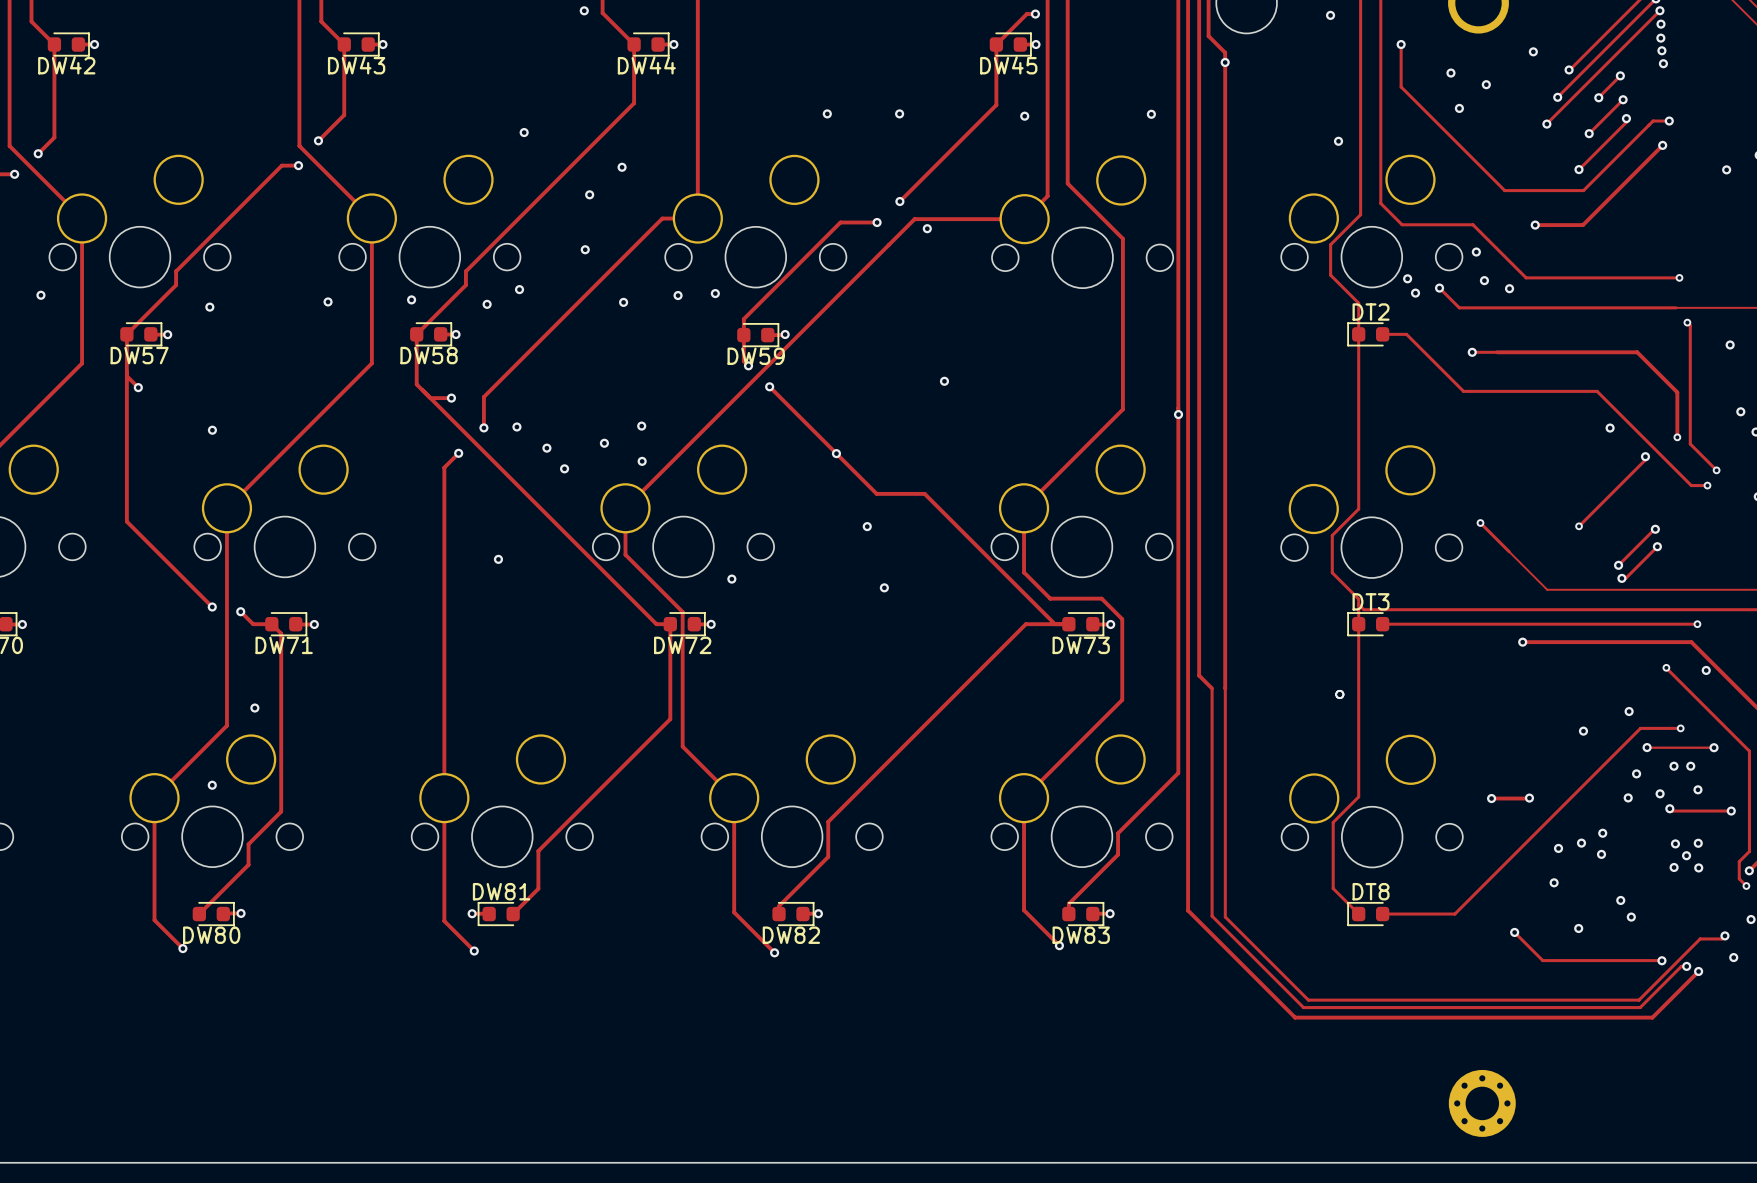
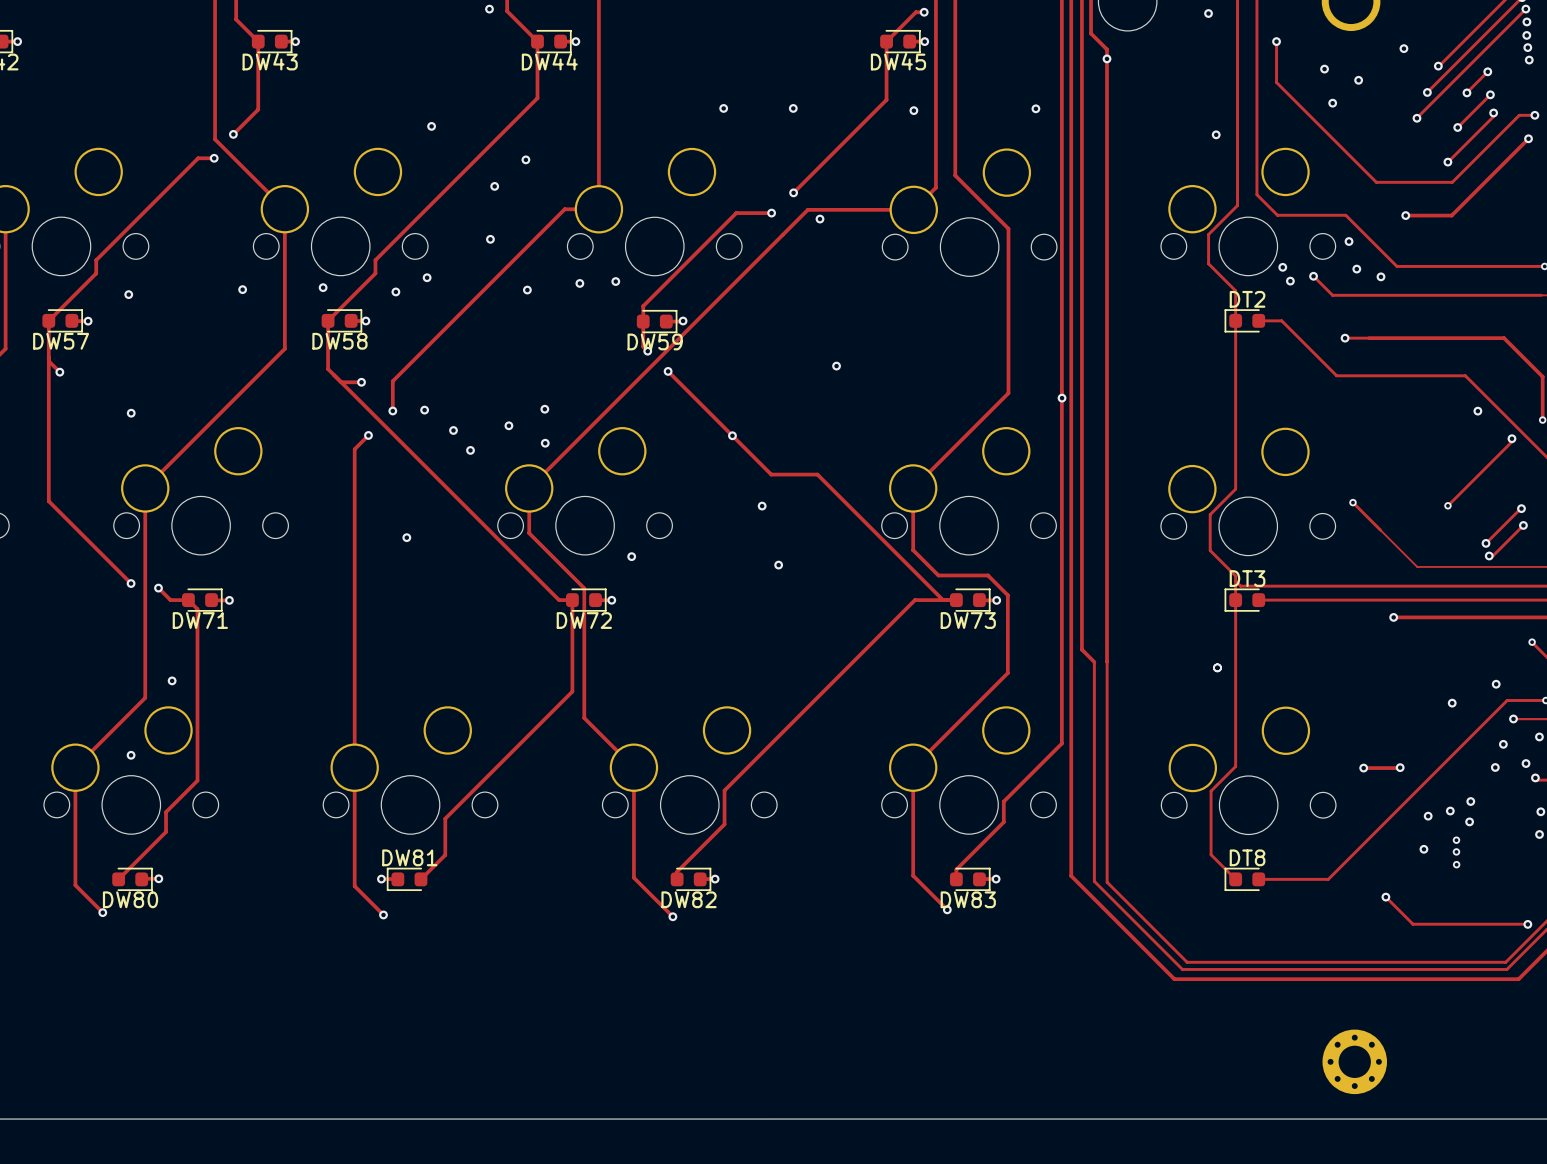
via: none -> (1456, 840)
via: none -> (1456, 851)
via: none -> (1456, 864)
via: (1620, 900) -> none
via: (1631, 917) -> none
via: (1578, 928) -> none

